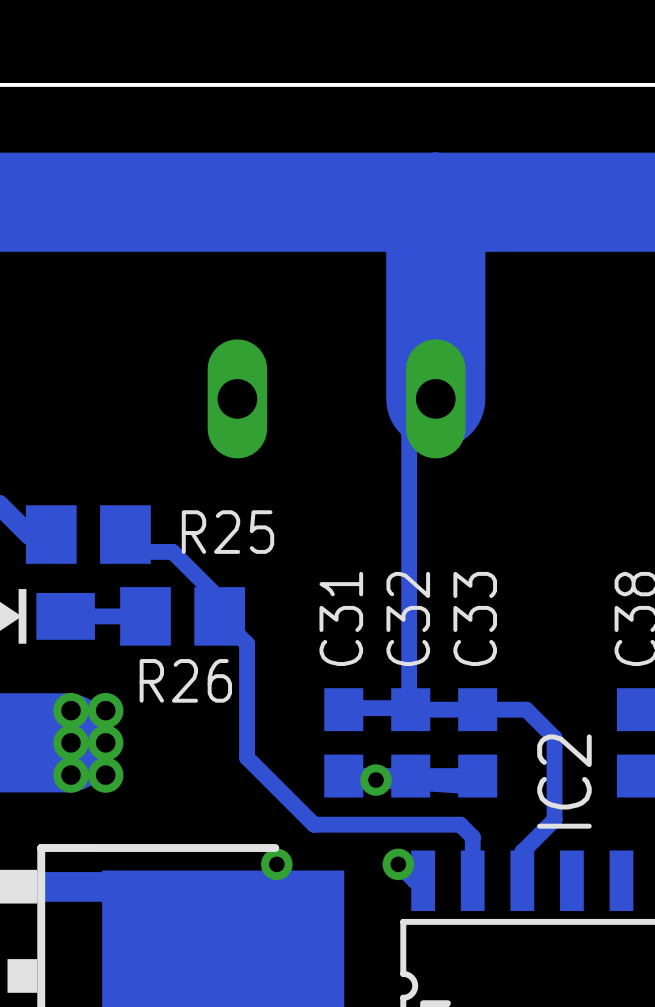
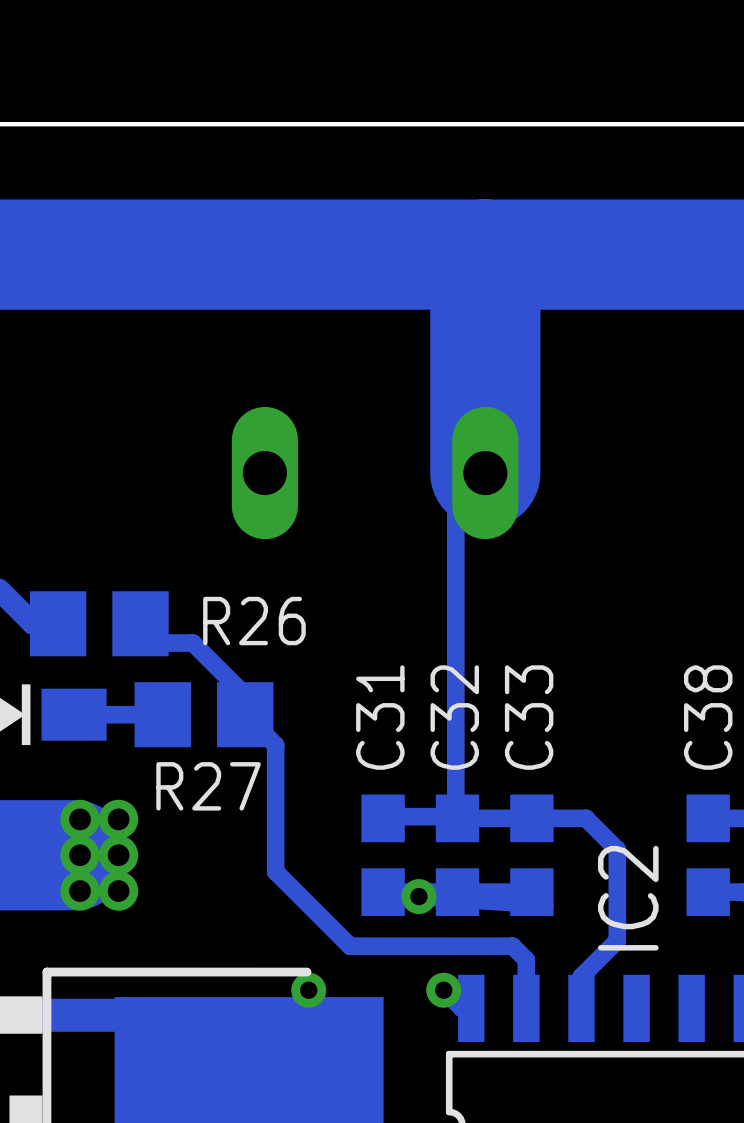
R25 name: R25 (227, 532) -> R26 (254, 621)
R26 name: R26 (185, 680) -> R27 (208, 786)

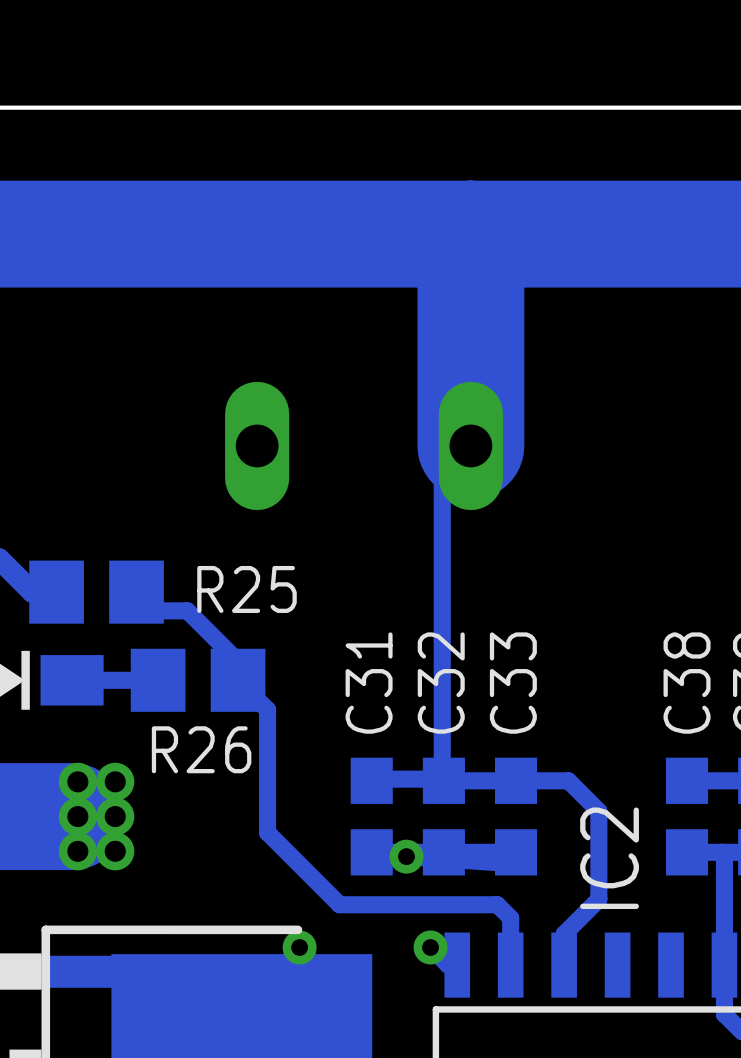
R26 name: R26 (254, 621) -> R25 (247, 589)
R27 name: R27 (208, 786) -> R26 (201, 749)

